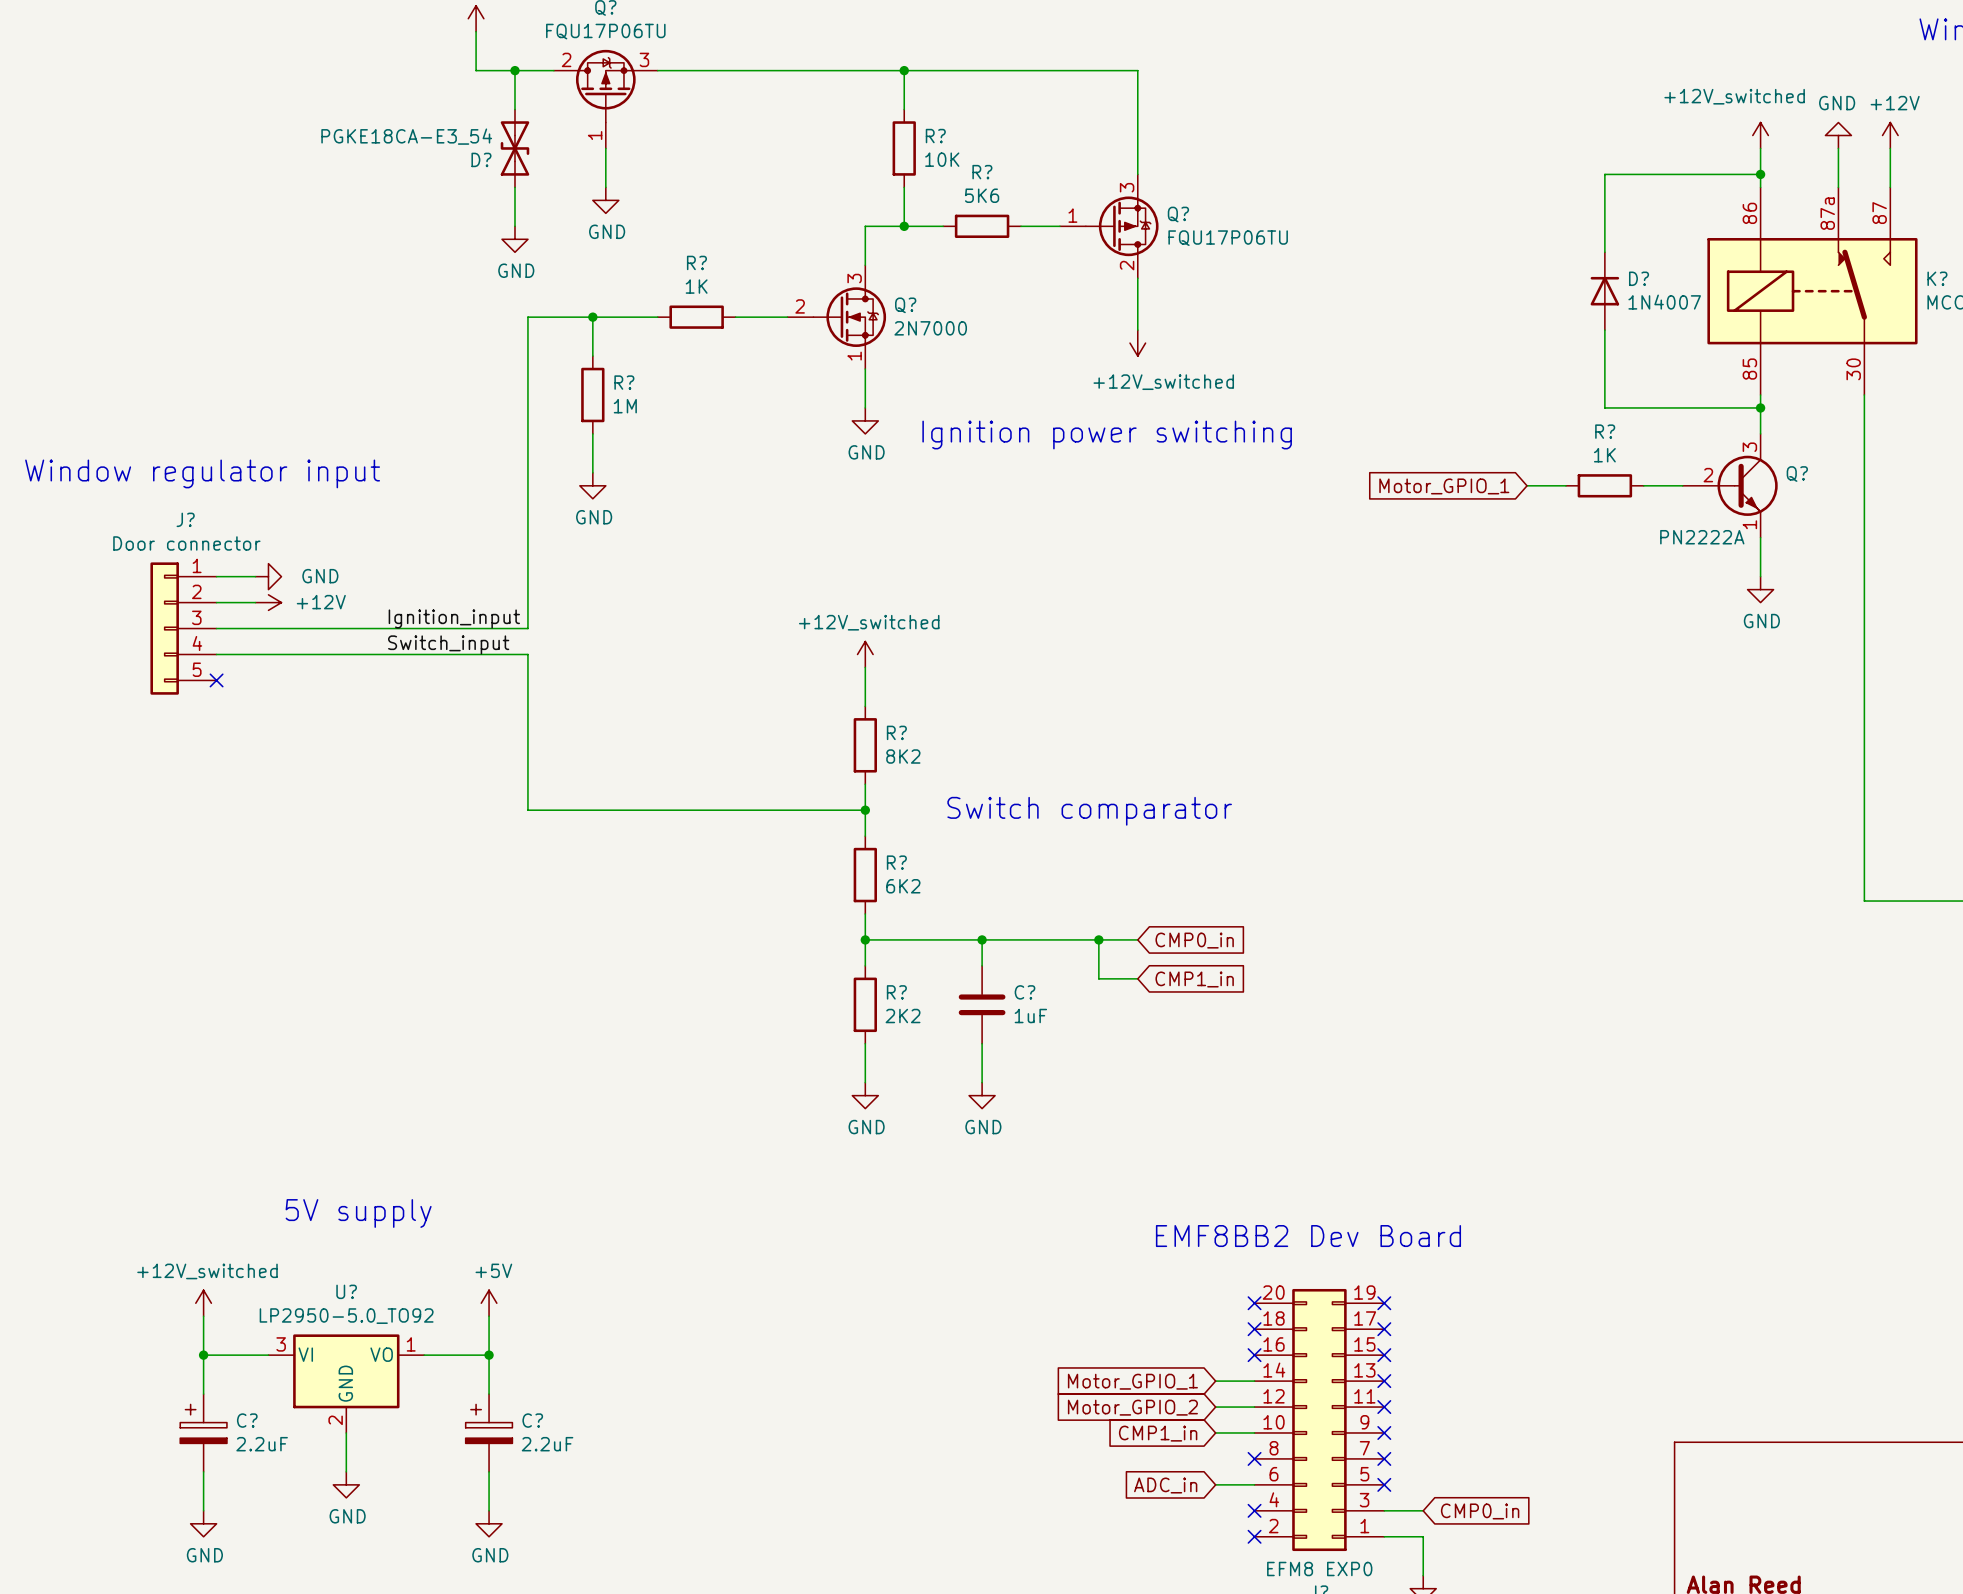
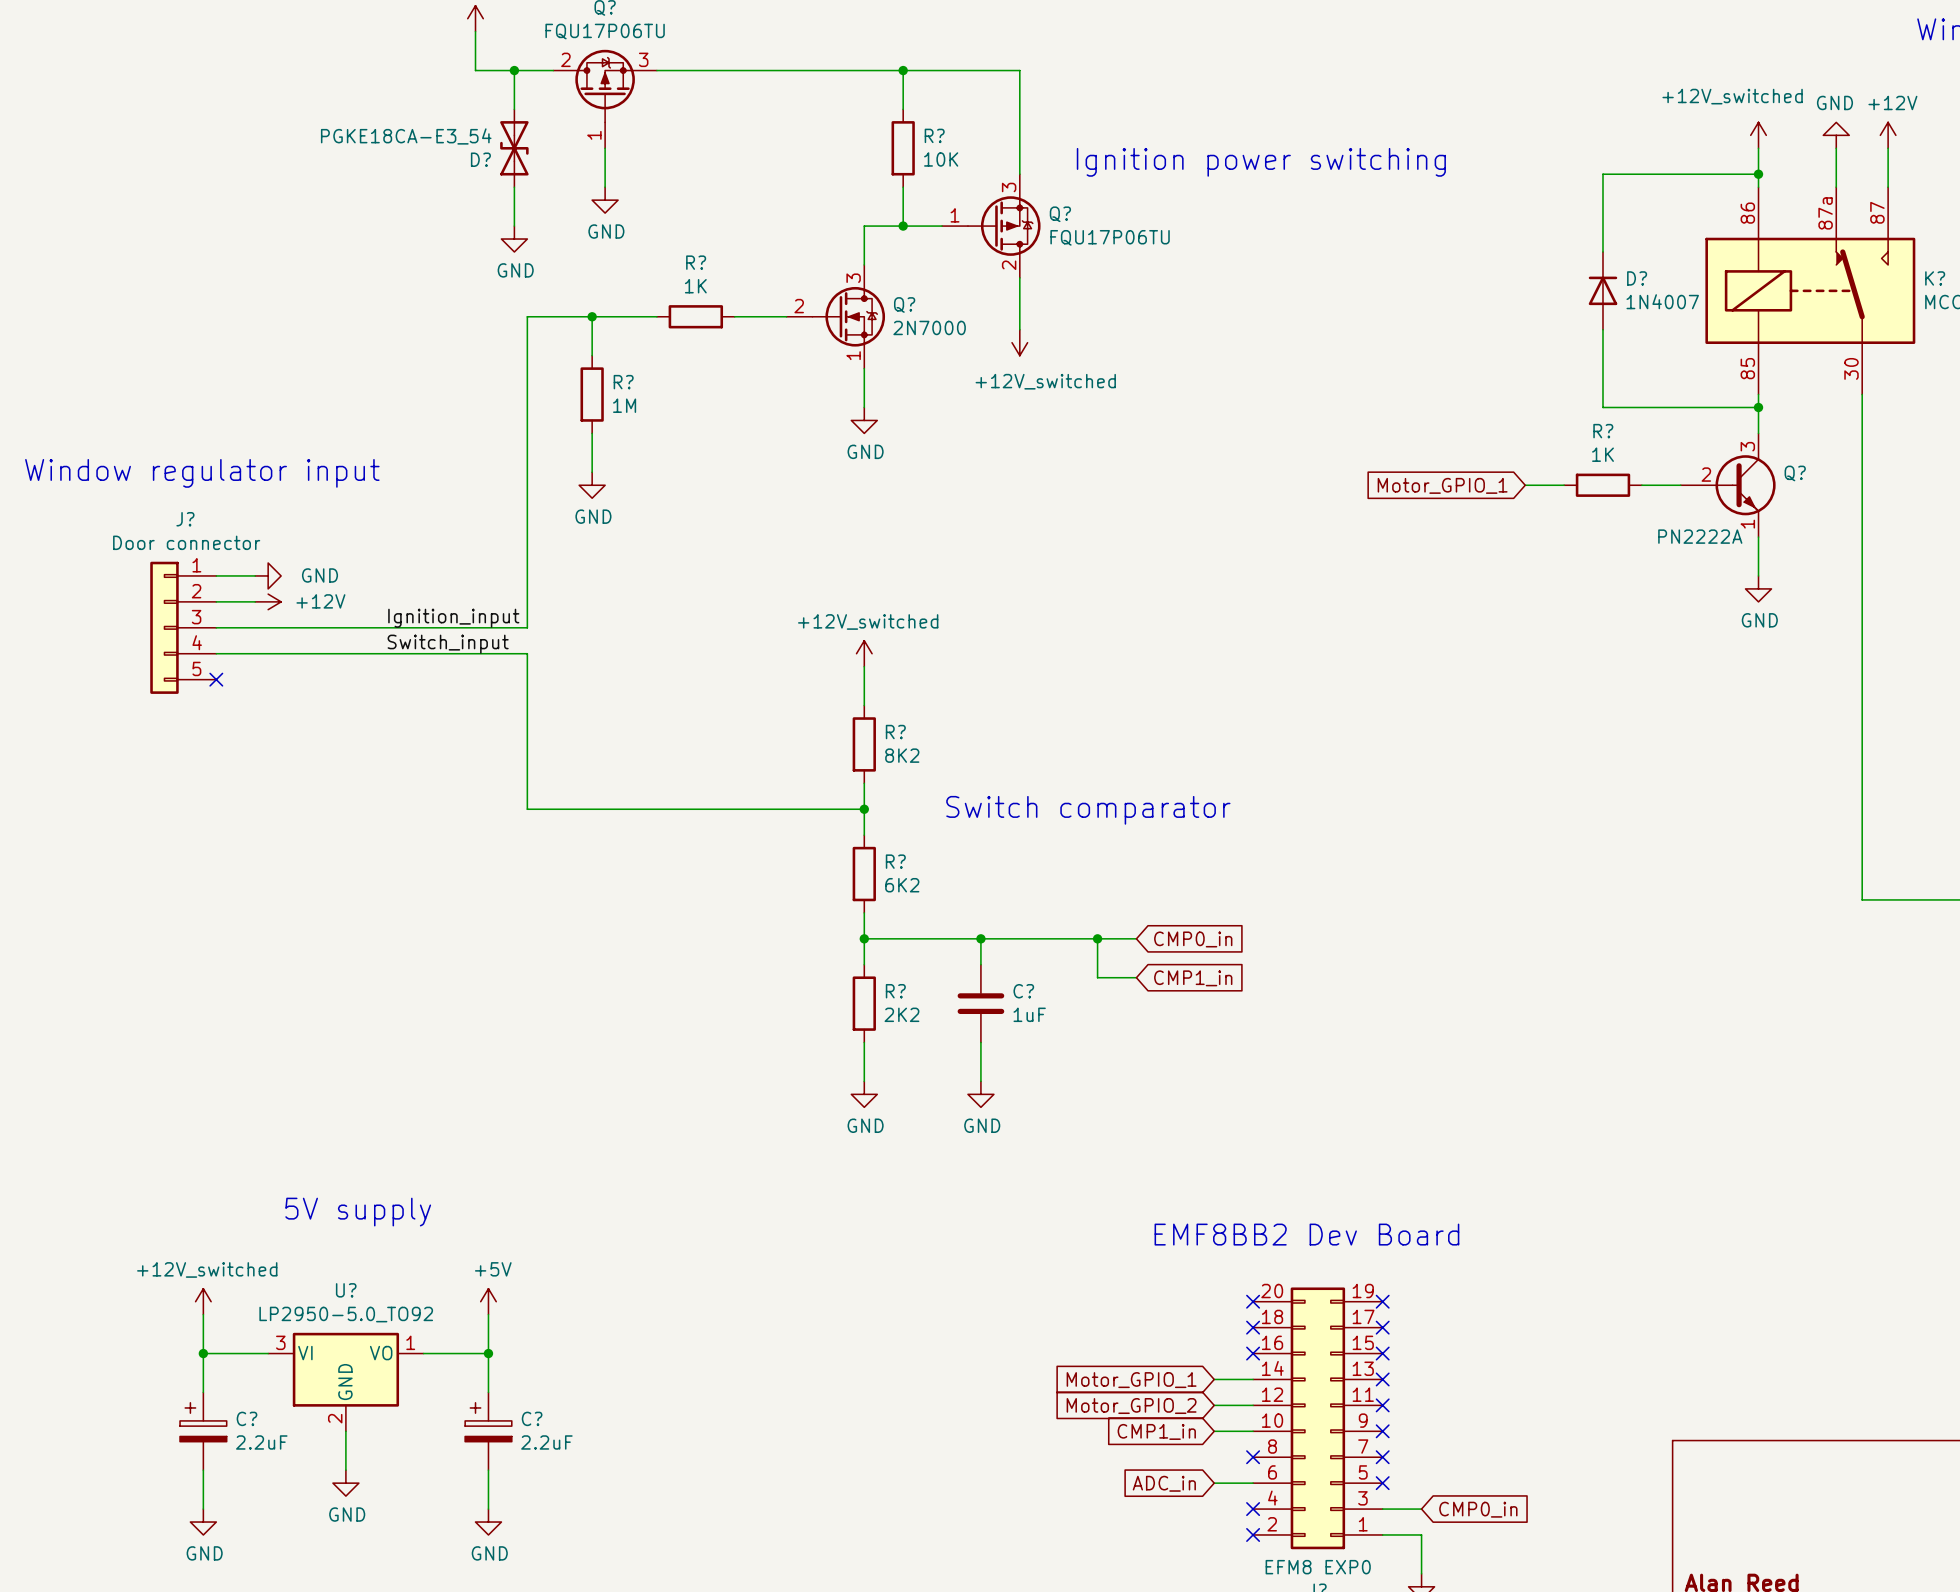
wire: (1021, 70) (1137, 70) (1137, 174) -> (1019, 70) (1019, 174)
text: none -> Ignition power switching (1261, 162)
R?: 5K6 (982, 226) -> none
wire: (1021, 226) (1059, 226) -> none
Q? position: (1109, 226) -> (991, 226)
wire: (1137, 278) (1137, 330) -> (1019, 277) (1019, 329)
power symbol position: +12V_switched (1137, 343) -> +12V_switched (1019, 342)
text: Ignition power switching (1107, 435) -> none

